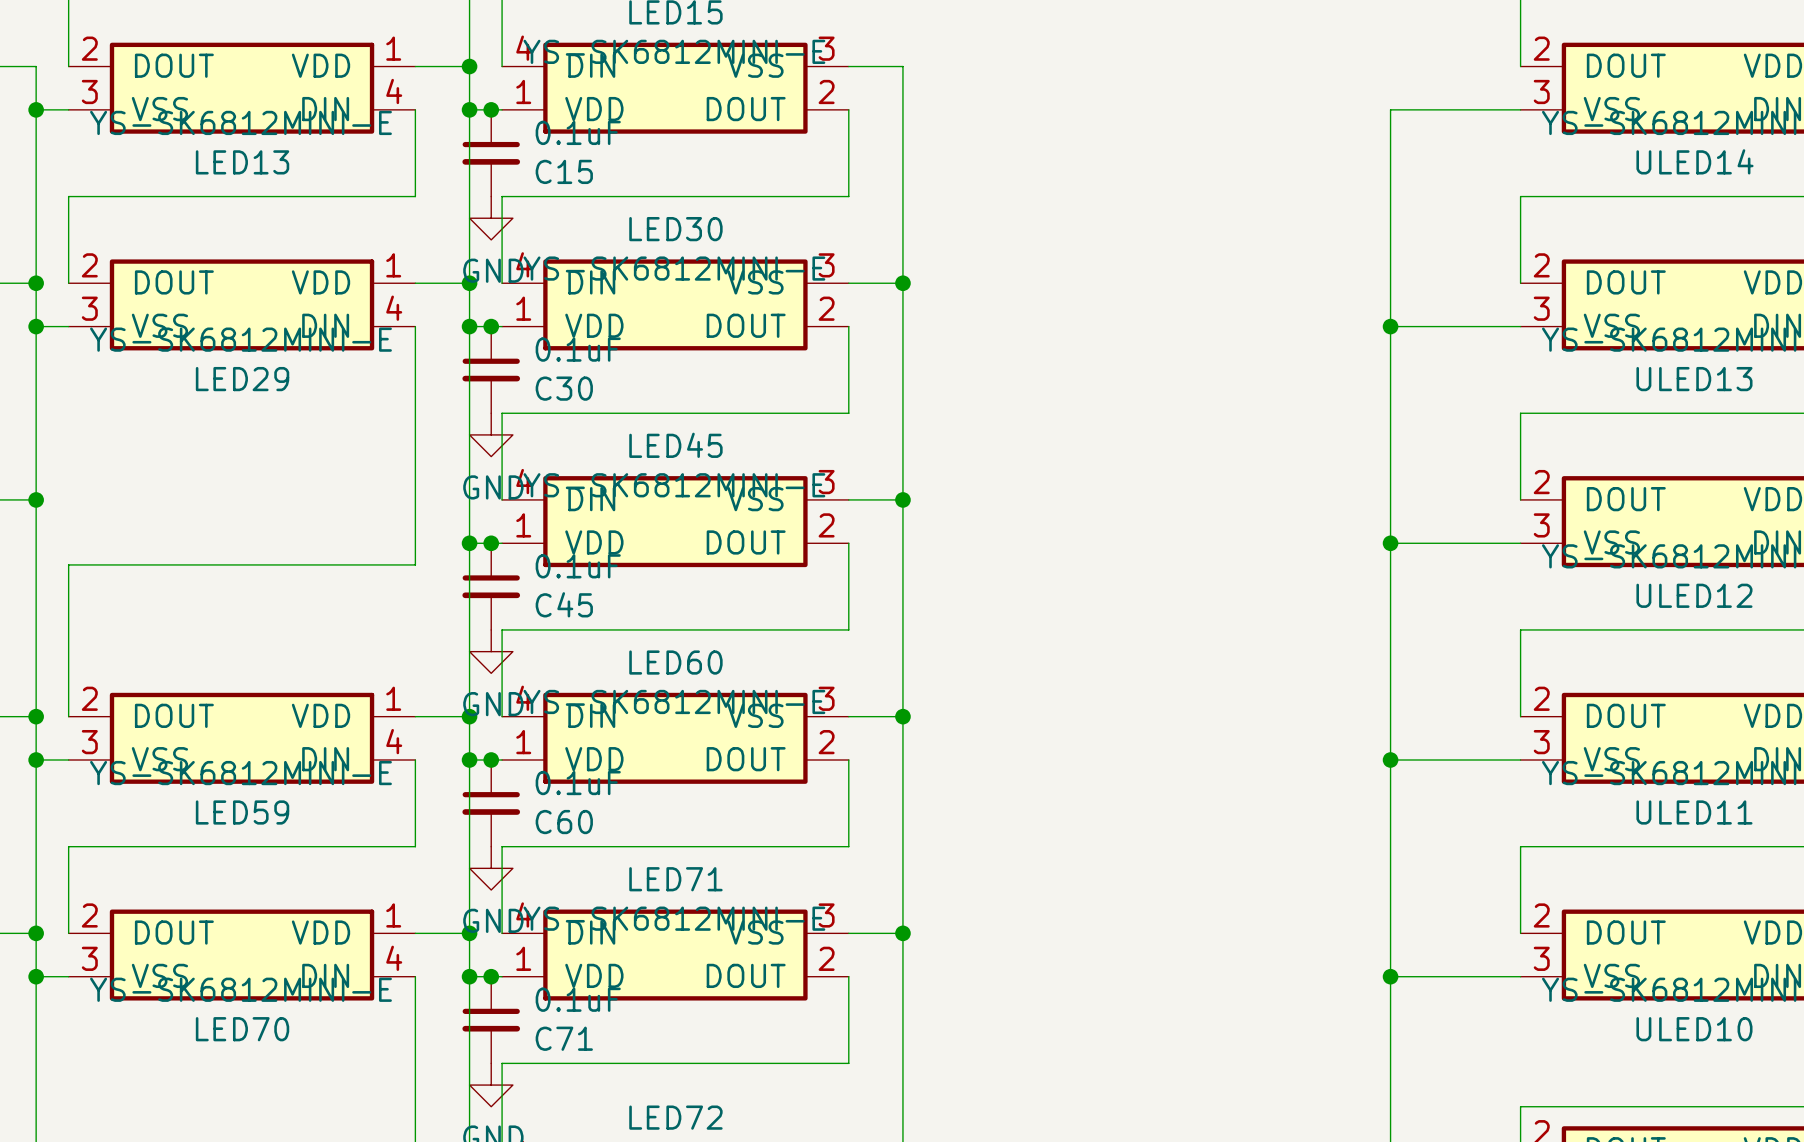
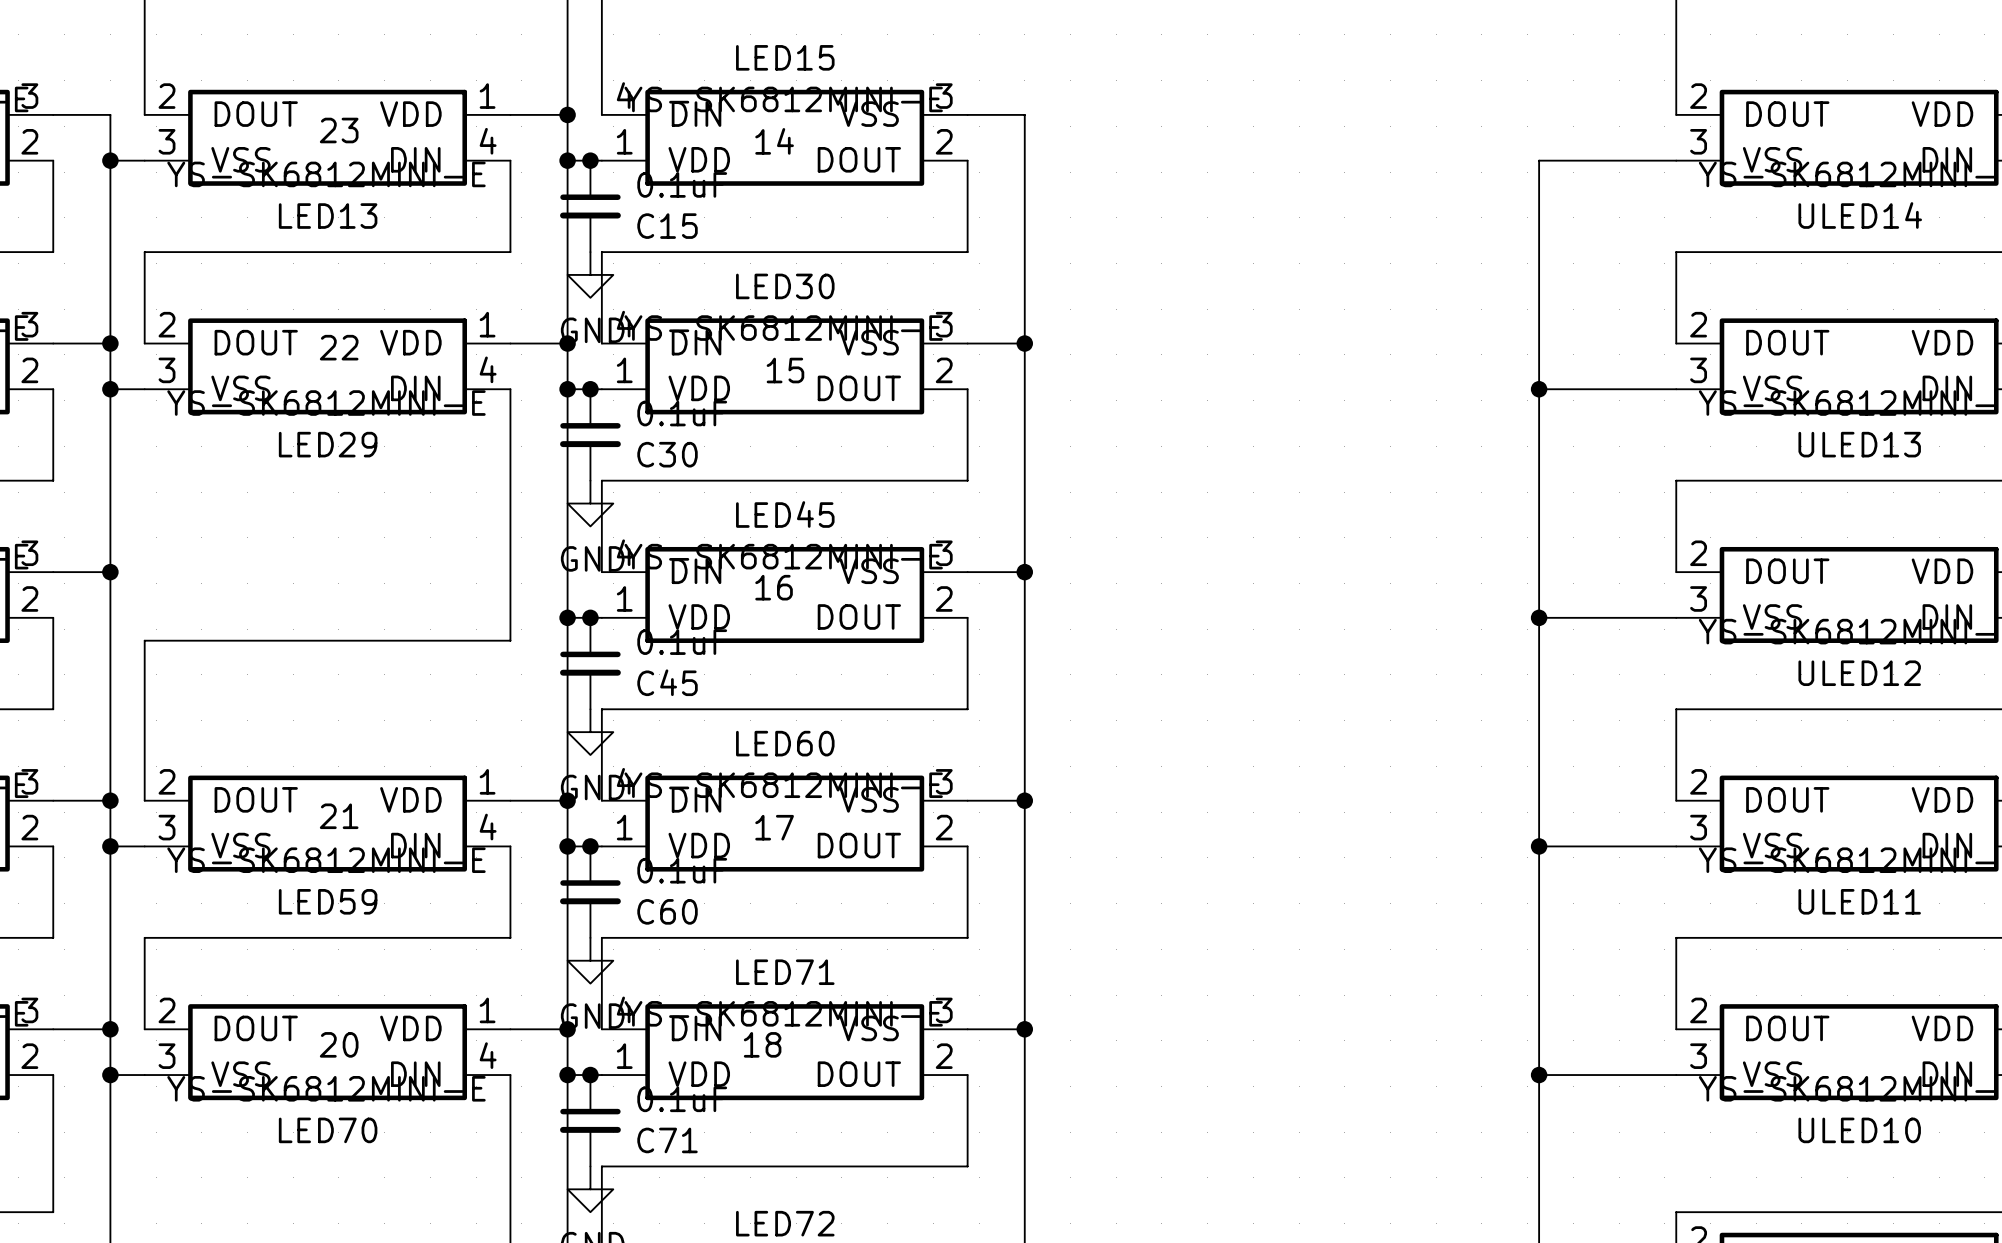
text: none -> 23 (339, 130)
text: none -> 14 (774, 141)
text: none -> 22 (339, 347)
text: none -> 15 (785, 370)
text: none -> 16 (774, 587)
text: none -> 21 (339, 816)
text: none -> 17 (774, 827)
text: none -> 20 (339, 1044)
text: none -> 18 (762, 1044)

